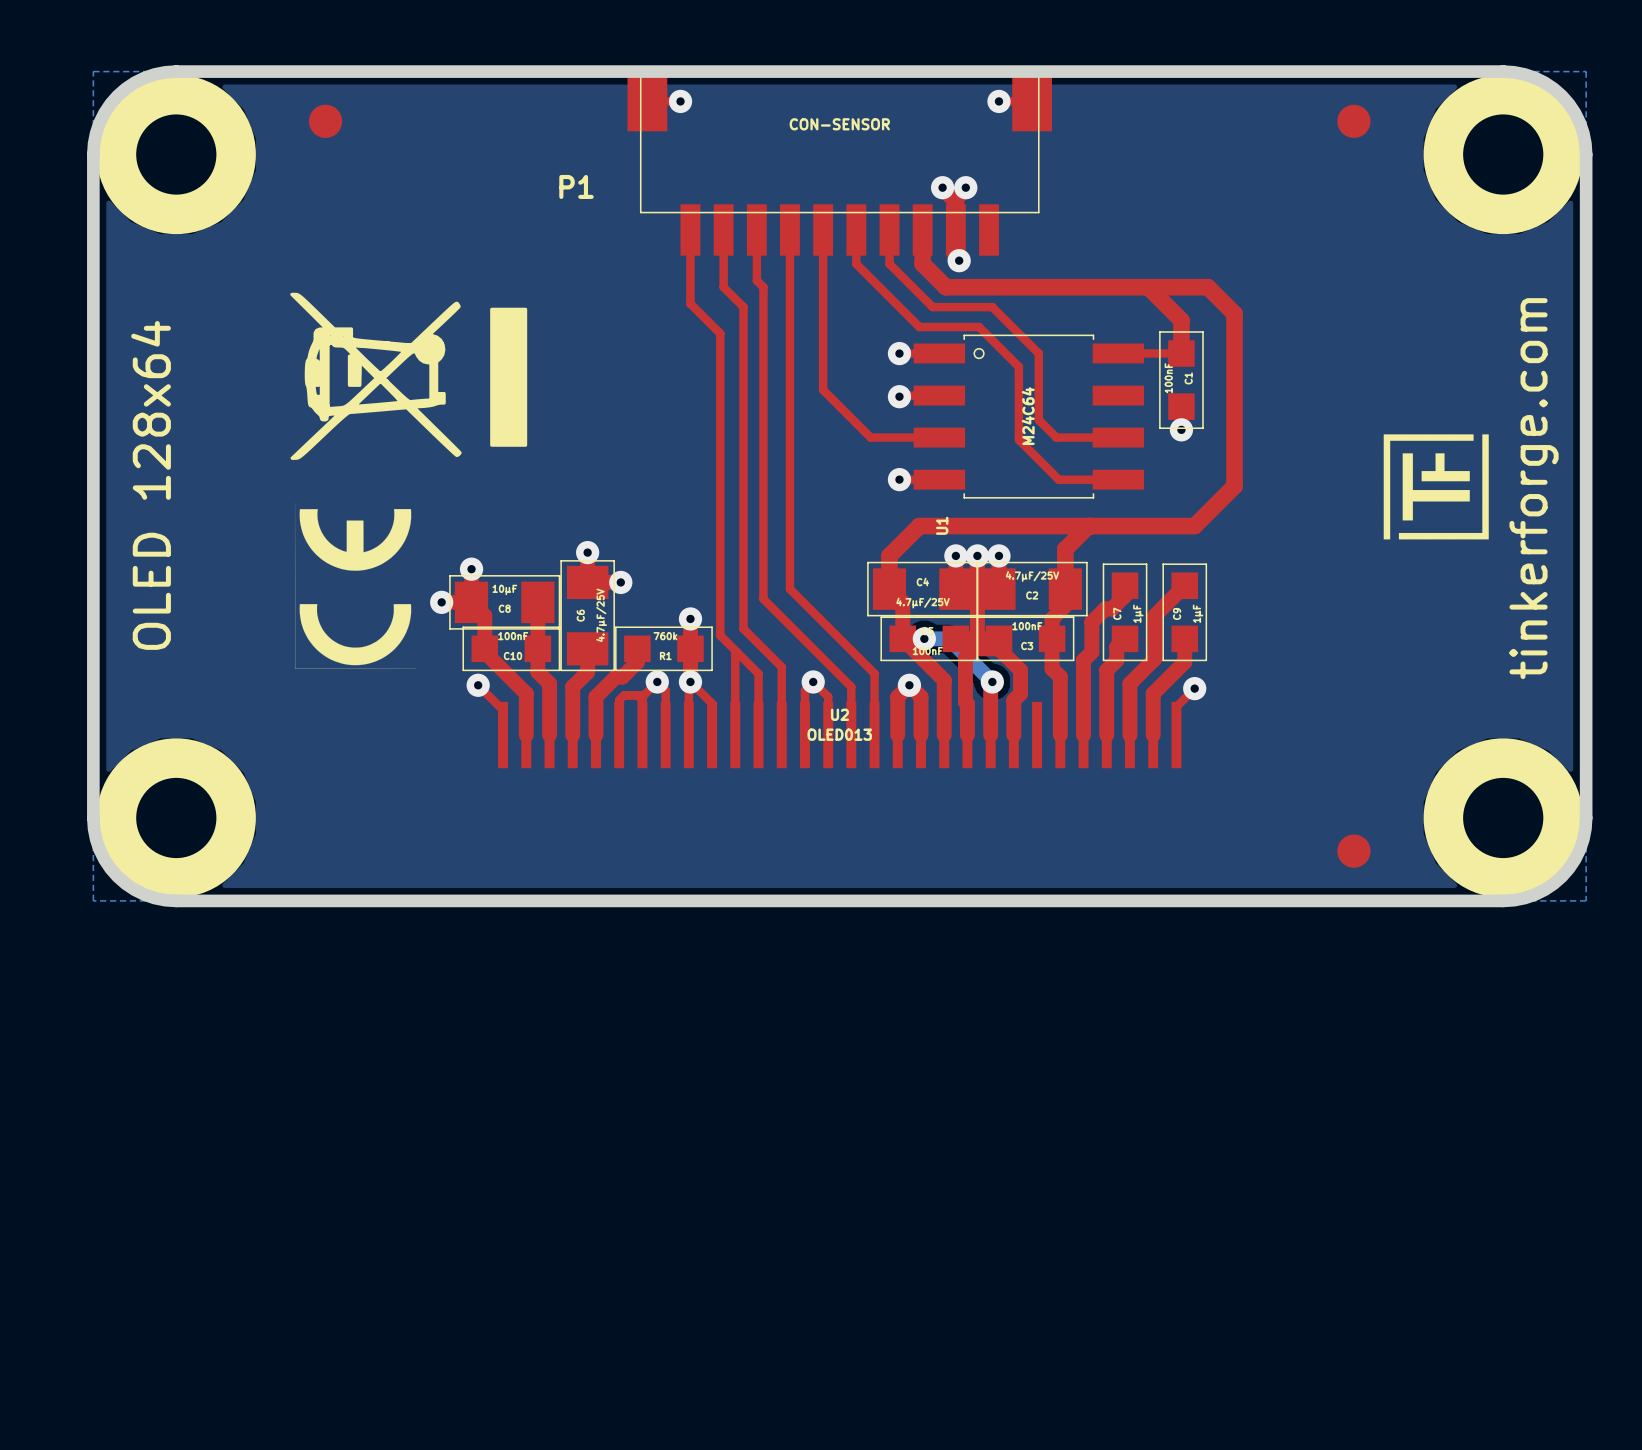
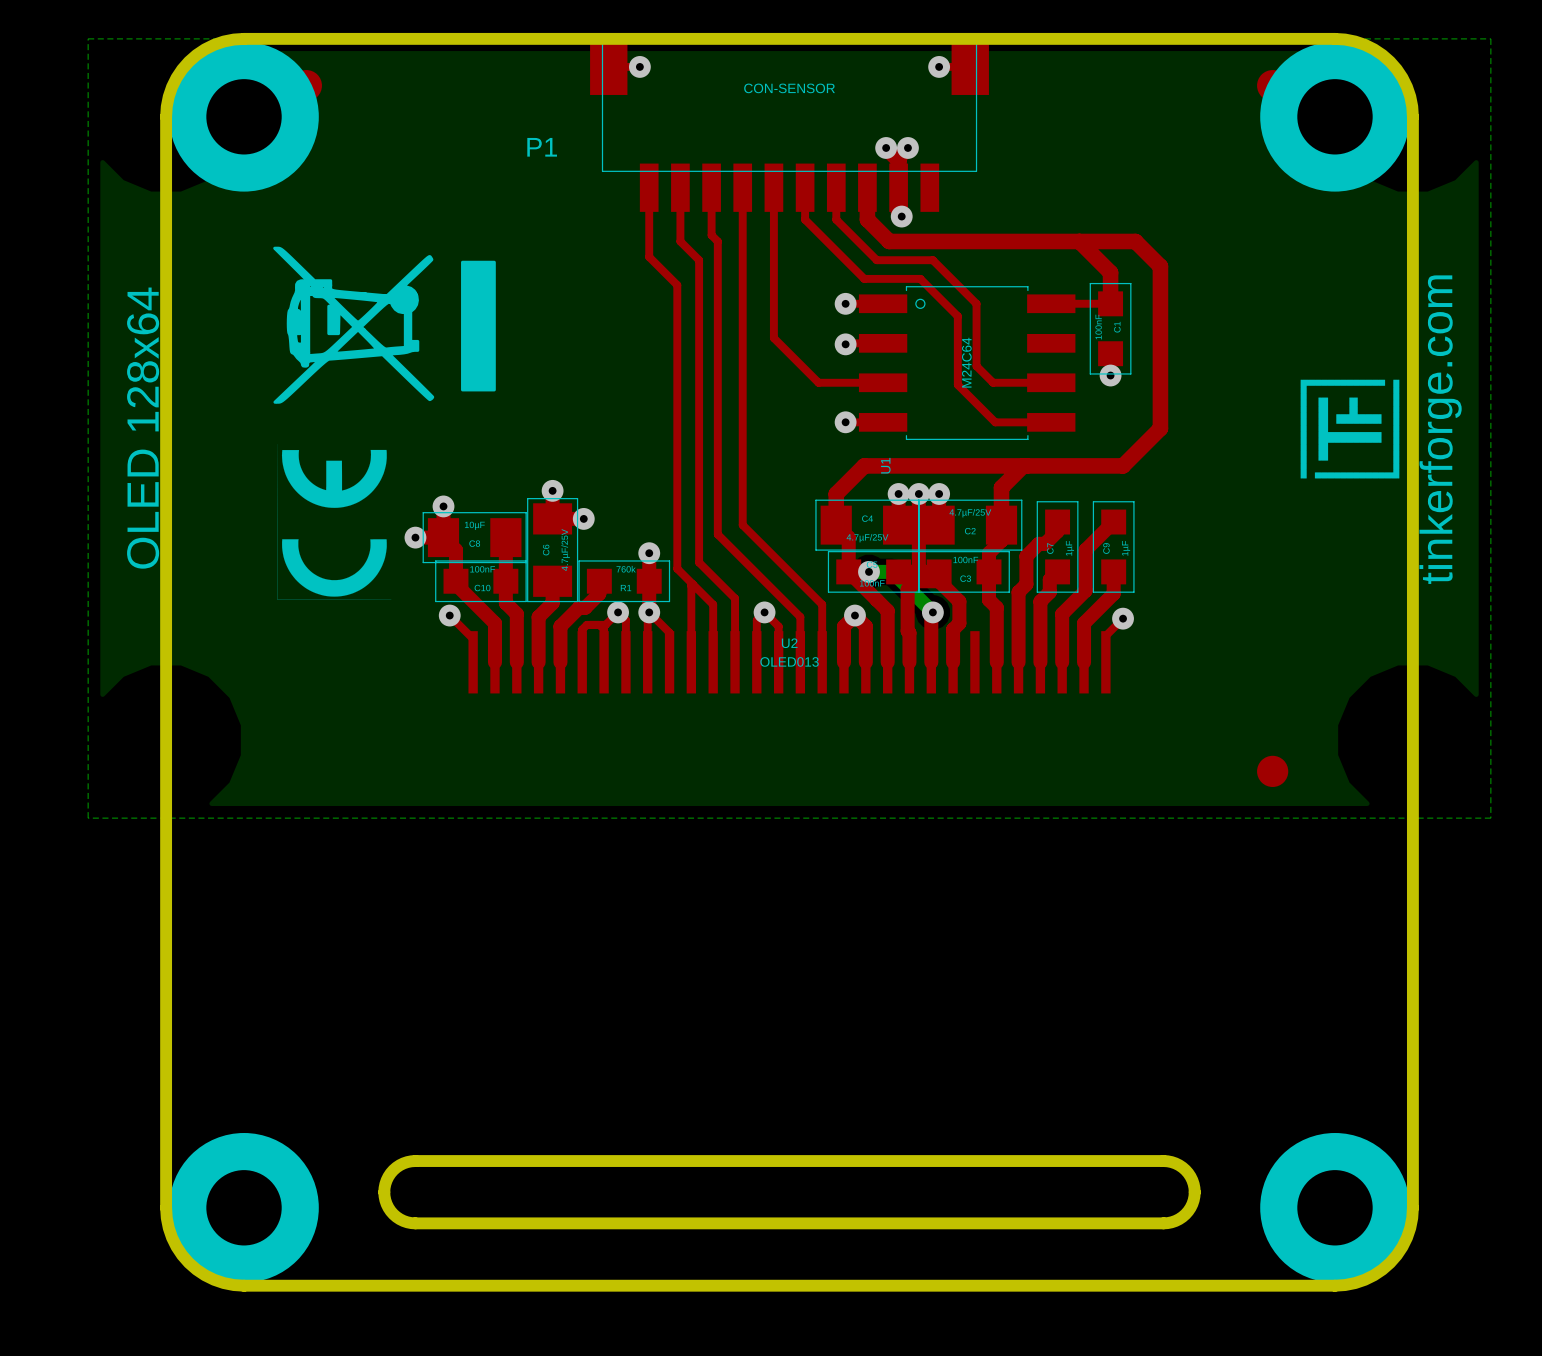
board edge: (259, 71) (176, 71) (144, 77) (125, 88) (110, 104) (99, 122) (94, 143) (94, 828) (104, 859) (117, 876) (134, 889) (165, 900) (1503, 900) (1524, 898) (1544, 889) (1561, 876) (1575, 859) (1583, 839) (1586, 817) (1585, 143) (1579, 122) (1569, 104) (1553, 88) (1534, 77) (1503, 71) (1420, 71) -> (244, 38) (214, 44) (188, 61) (172, 86) (166, 116) (166, 1217) (176, 1246) (196, 1269) (223, 1283) (244, 1285) (1335, 1285) (1355, 1283) (1373, 1275) (1396, 1255) (1410, 1227) (1412, 1207) (1412, 116) (1406, 86) (1390, 61) (1364, 44) (1335, 38)
part position: (176, 154) -> (244, 116)
part position: (1503, 154) -> (1335, 116)
part: (176, 817) -> none
part: (1503, 817) -> none
board edge: none -> (415, 1161) (1163, 1161) (1175, 1163) (1185, 1170) (1192, 1180) (1194, 1192) (1192, 1204) (1185, 1214) (1175, 1220) (1163, 1223) (415, 1223) (403, 1220) (393, 1214) (386, 1204) (384, 1192) (386, 1180) (393, 1170) (403, 1163) (415, 1161)
part: none -> (244, 1207)
part: none -> (1335, 1207)

